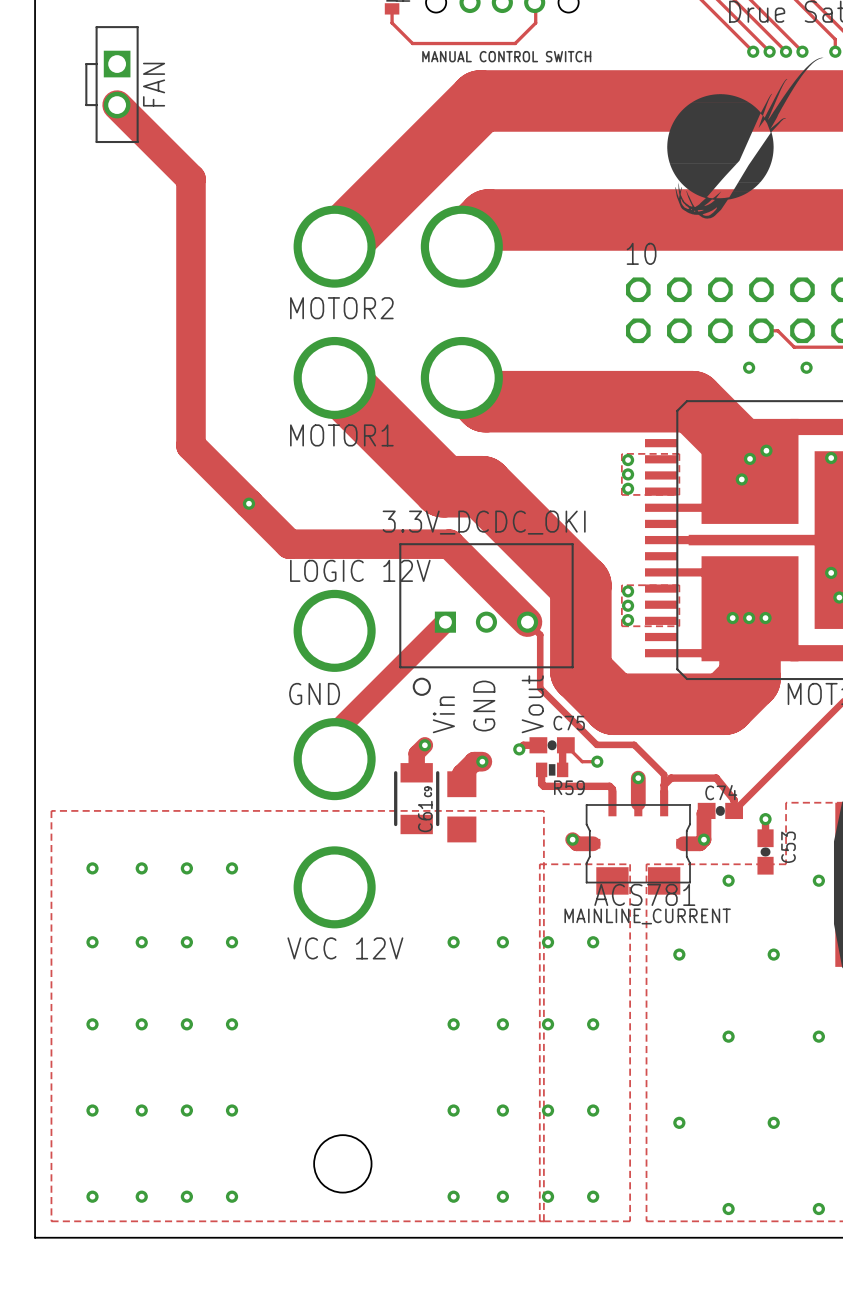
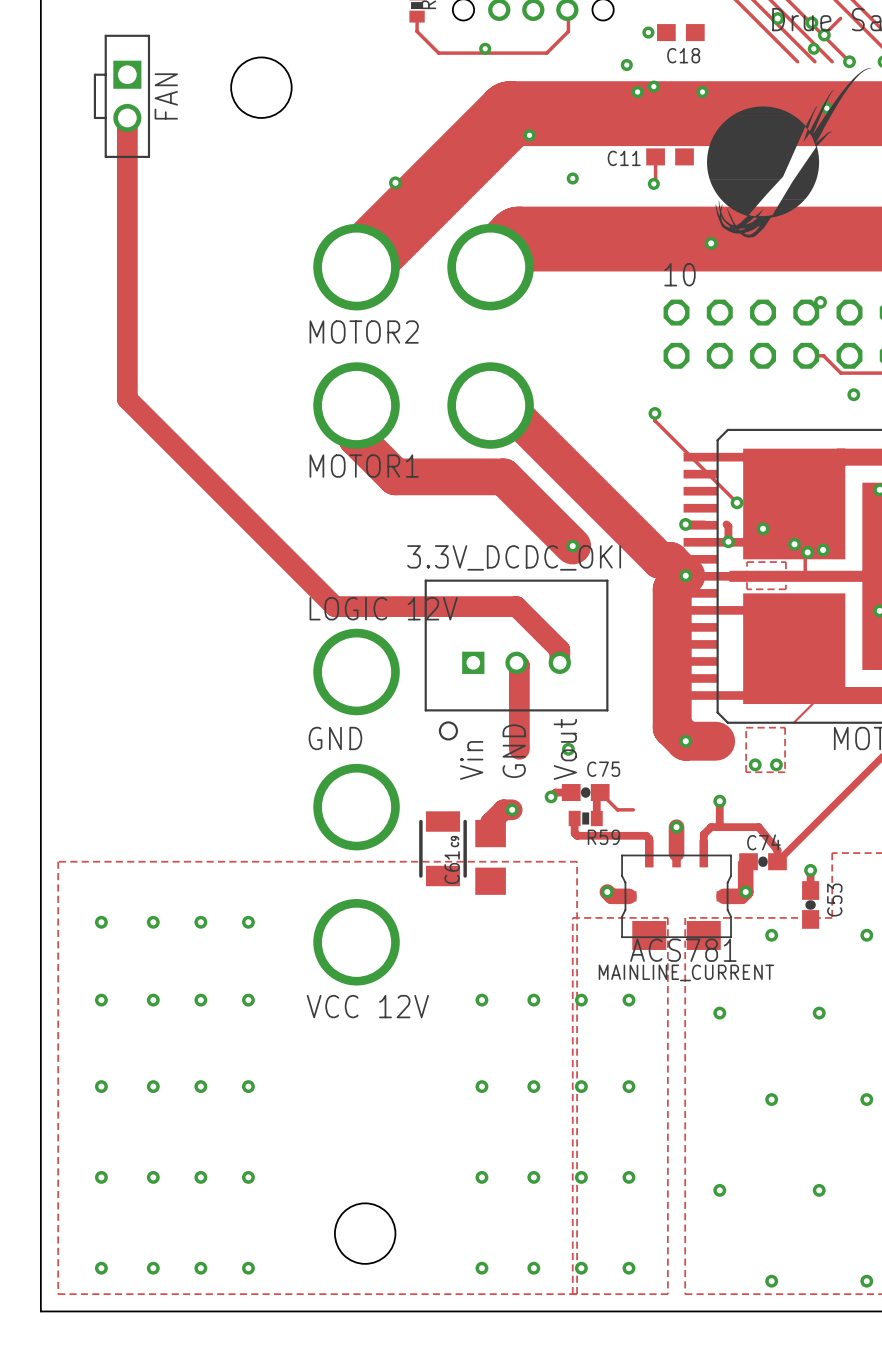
via: none -> (777, 18)
track: none -> (840, 18) (824, 35)
via: none -> (811, 22)
via: none -> (648, 32)
C18: none -> (680, 32)
via: none -> (824, 35)
via: none -> (485, 48)
via: none -> (813, 48)
drawing: none -> [230, 57, 292, 119]
via: (753, 51) -> none
via: (769, 51) -> none
via: (786, 51) -> none
via: none -> (626, 65)
text: MANUAL CONTROL SWITCH (506, 56) -> none
via: none -> (653, 86)
track: none -> (729, 90) (704, 90) (702, 92)
via: none -> (637, 92)
via: none -> (702, 92)
via: none -> (826, 108)
track: (117, 105) (190, 178) (190, 445) -> (127, 117) (127, 399) (205, 476)
via: none -> (529, 135)
track: none -> (655, 156) (655, 182) (653, 183)
C11: none -> (670, 156)
via: none -> (572, 178)
via: none -> (395, 182)
via: none -> (653, 183)
via: none -> (711, 243)
via: none -> (820, 302)
via: (749, 367) -> none
track: (334, 377) (443, 486) (482, 486) (580, 585) (580, 671) (613, 704) (724, 704) (750, 678) -> (356, 405) (356, 437) (395, 476) (503, 476) (572, 546)
track: (461, 377) (485, 401) (692, 401) (750, 458) (750, 471) -> (490, 405) (505, 405) (660, 560) (670, 560) (685, 575) (672, 589) (672, 727) (685, 741) (715, 741)
track: none -> (654, 413) (654, 420) (737, 502)
via: none -> (654, 413)
track width: thick (190, 445) (289, 544) -> thin (205, 476) (308, 580)
via: (766, 450) -> none
zone outline: (621, 453) (621, 494) (679, 494) (679, 453) (621, 453) -> none
via: (750, 458) -> none
via: (628, 460) -> none
via: none -> (737, 502)
via: (628, 474) -> none
via: (741, 479) -> none
via: (628, 488) -> none
via: none -> (685, 524)
track: none -> (726, 524) (728, 526) (728, 541)
via: none -> (763, 528)
via: (248, 503) -> none
via: none -> (728, 541)
via: none -> (794, 544)
via: none -> (572, 546)
via: none -> (823, 549)
track: none -> (807, 552) (805, 554) (805, 575)
via: none -> (807, 552)
zone outline: none -> (747, 562) (747, 589) (785, 589) (785, 562) (747, 562)
via: none -> (685, 575)
track: (289, 544) (449, 544) (540, 634) (540, 688) (596, 744) (634, 744) (664, 774) (664, 791) -> (308, 580) (334, 606) (516, 606) (559, 649) (559, 662)
zone outline: (621, 585) (679, 585) (679, 626) (621, 626) (621, 585) -> none
via: (628, 591) -> none
via: (628, 605) -> none
via: (732, 618) -> none
via: (749, 618) -> none
via: (765, 618) -> none
via: (628, 620) -> none
track: (445, 622) (334, 732) (334, 759) -> none
track: none -> (516, 662) (519, 665) (519, 749)
zone outline: none -> (746, 727) (746, 772) (785, 772) (785, 727) (746, 727)
via: none -> (685, 741)
via: none -> (568, 749)
via: none -> (755, 764)
via: none -> (776, 764)
track: (424, 745) (416, 753) (416, 772) -> none
via: (424, 745) -> none
track: none -> (719, 801) (719, 827)
via: none -> (719, 801)
via: (597, 761) -> none

